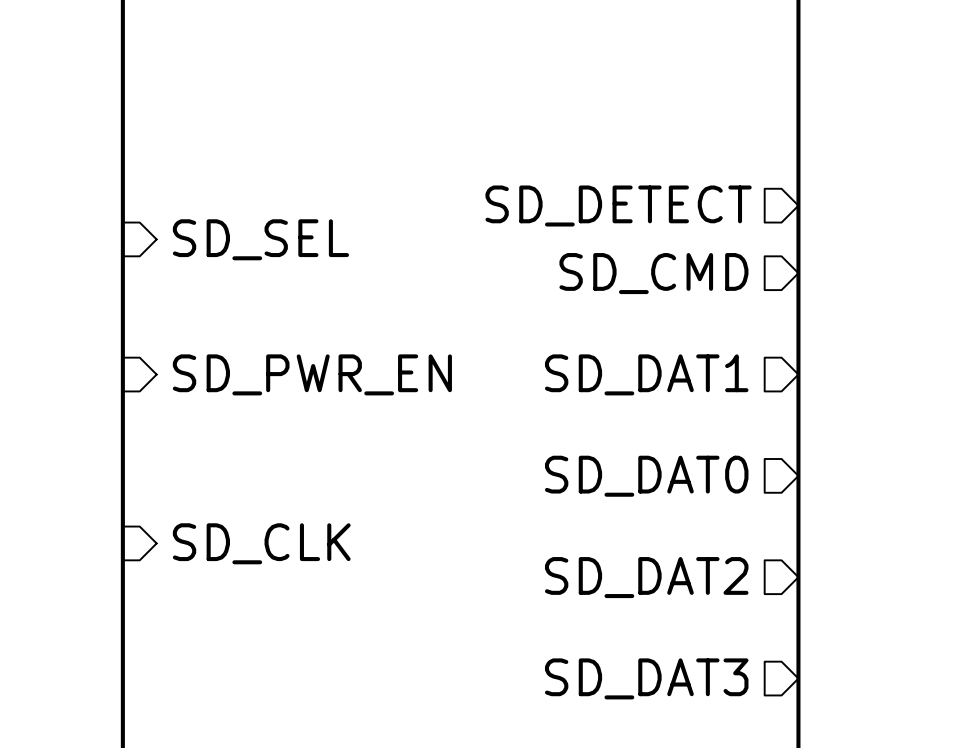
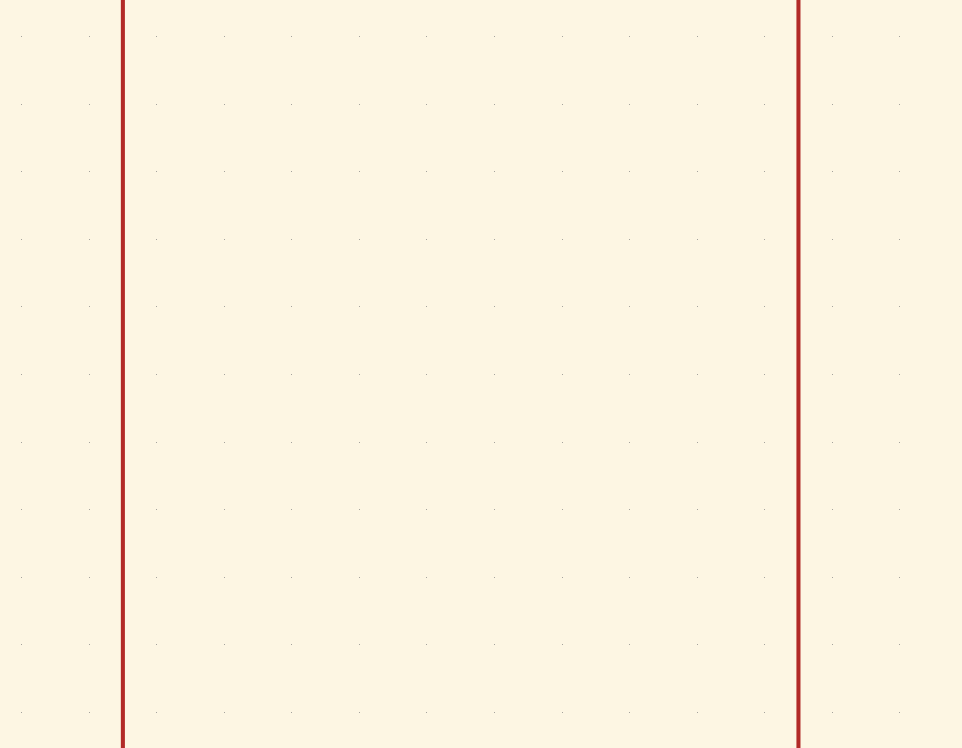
sheet pin: SD_DETECT (618, 206) -> none
sheet pin: SD_SEL (260, 239) -> none
sheet pin: SD_CMD (653, 273) -> none
sheet pin: SD_PWR_EN (312, 374) -> none
sheet pin: SD_DAT1 (646, 374) -> none
sheet pin: SD_DAT0 (646, 476) -> none
sheet pin: SD_CLK (261, 543) -> none
sheet pin: SD_DAT2 (646, 577) -> none
sheet pin: SD_DAT3 (646, 678) -> none

